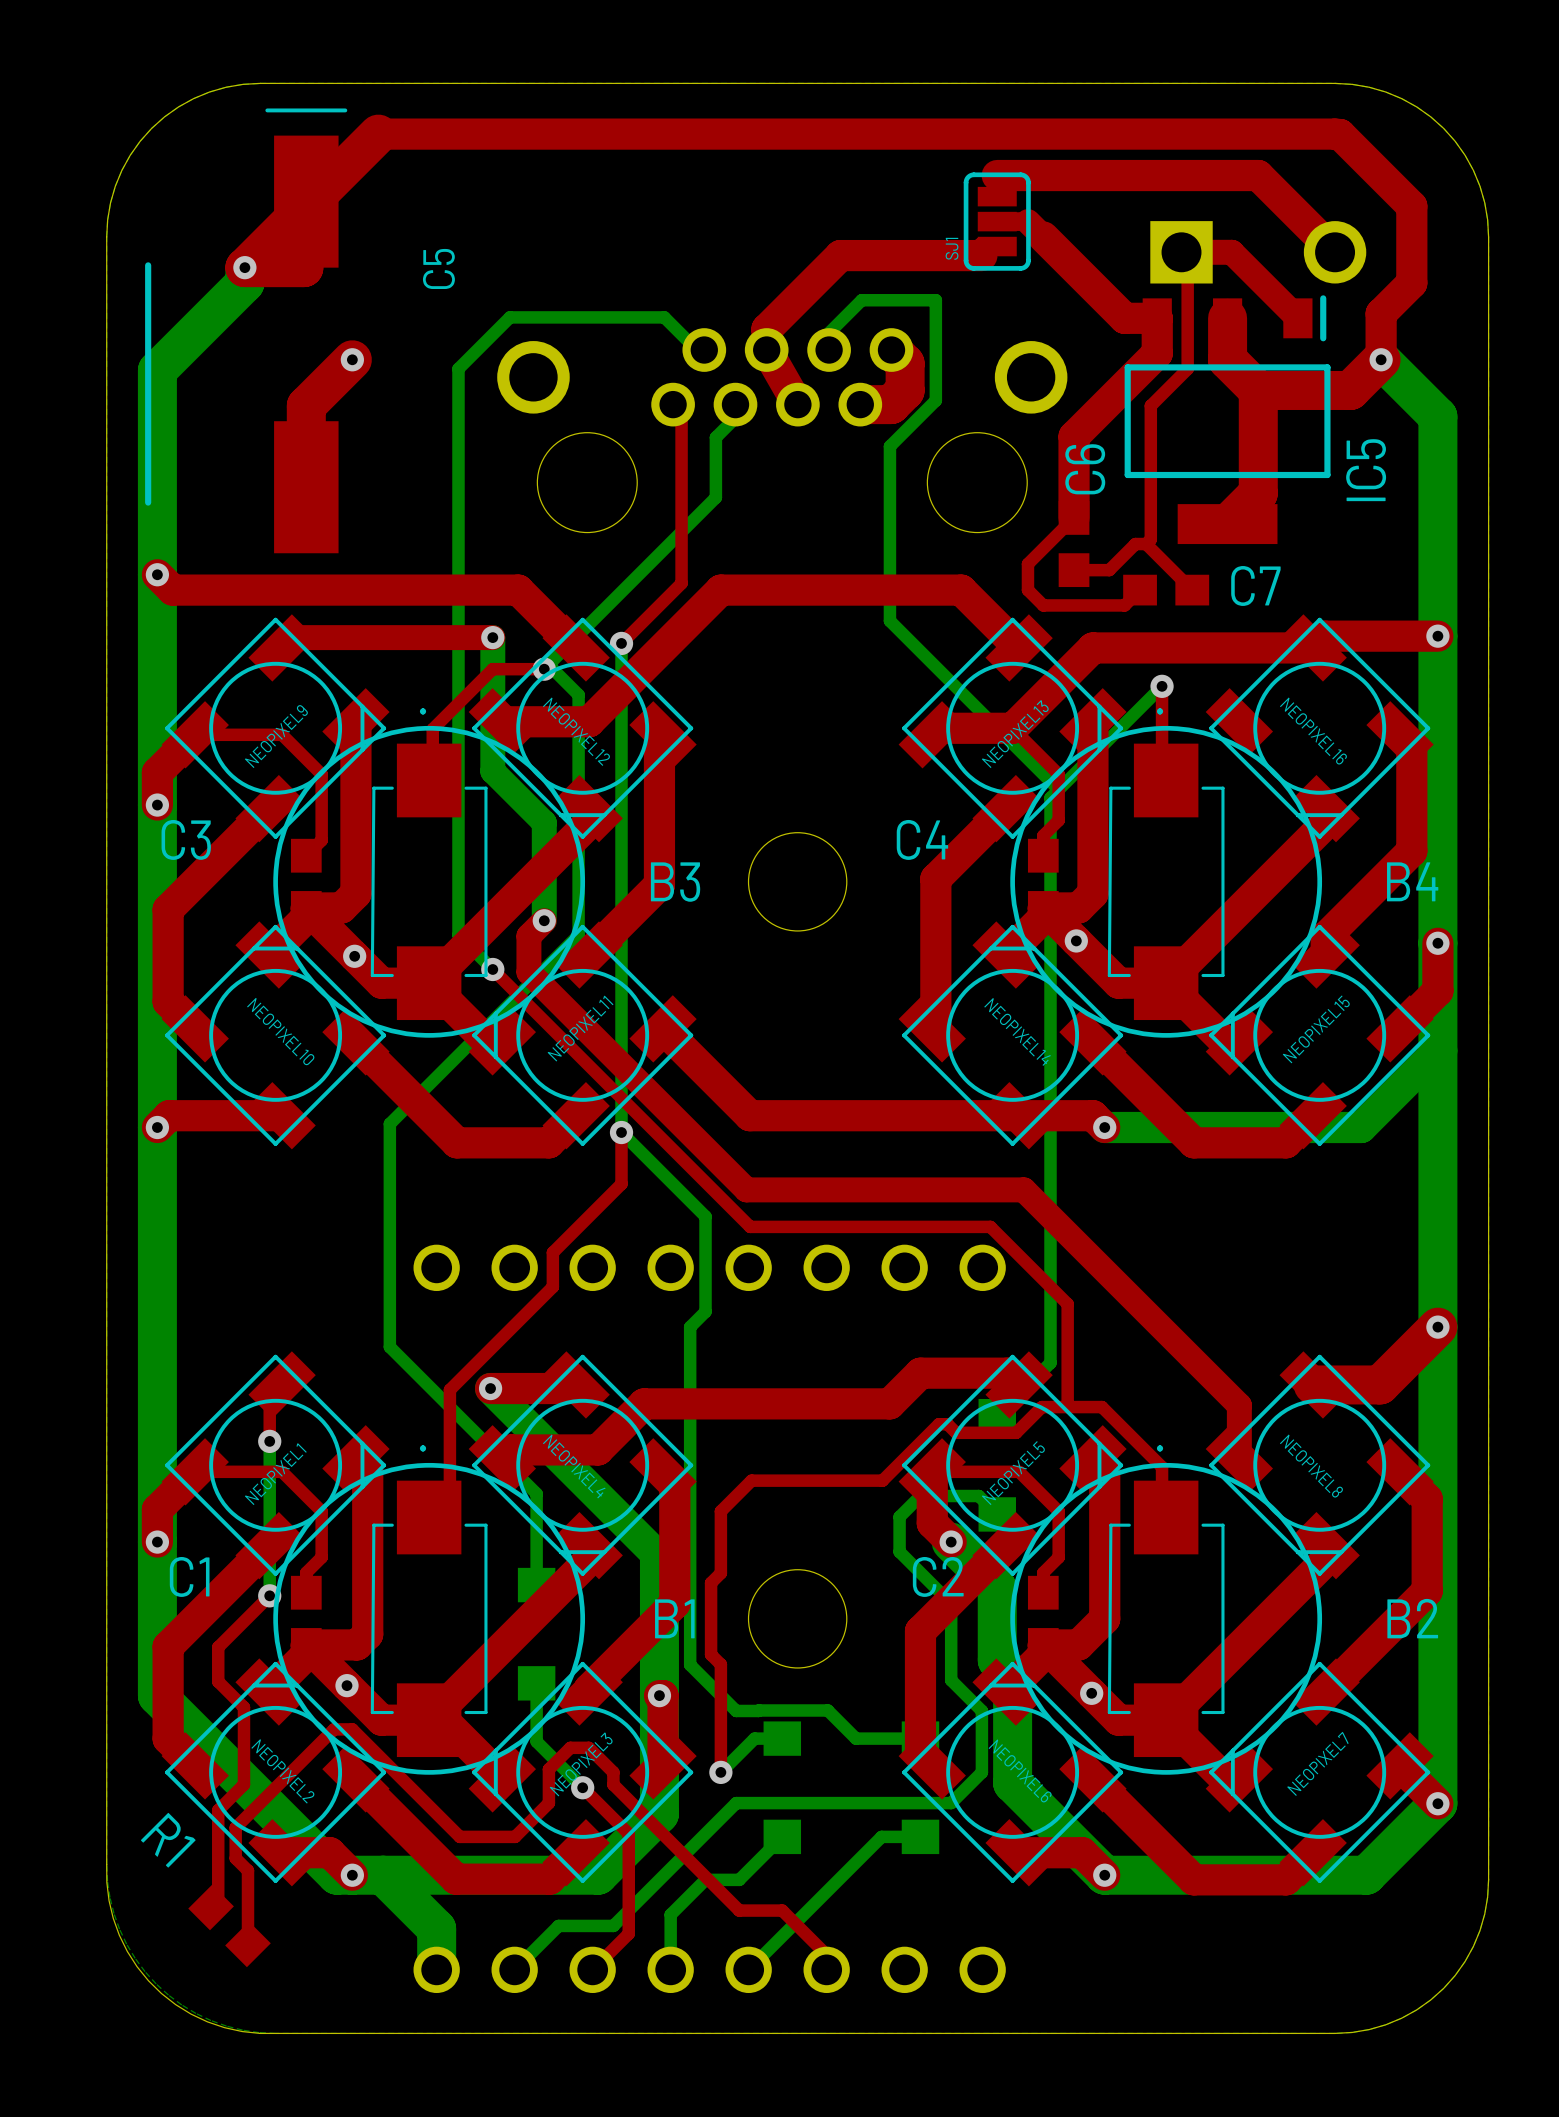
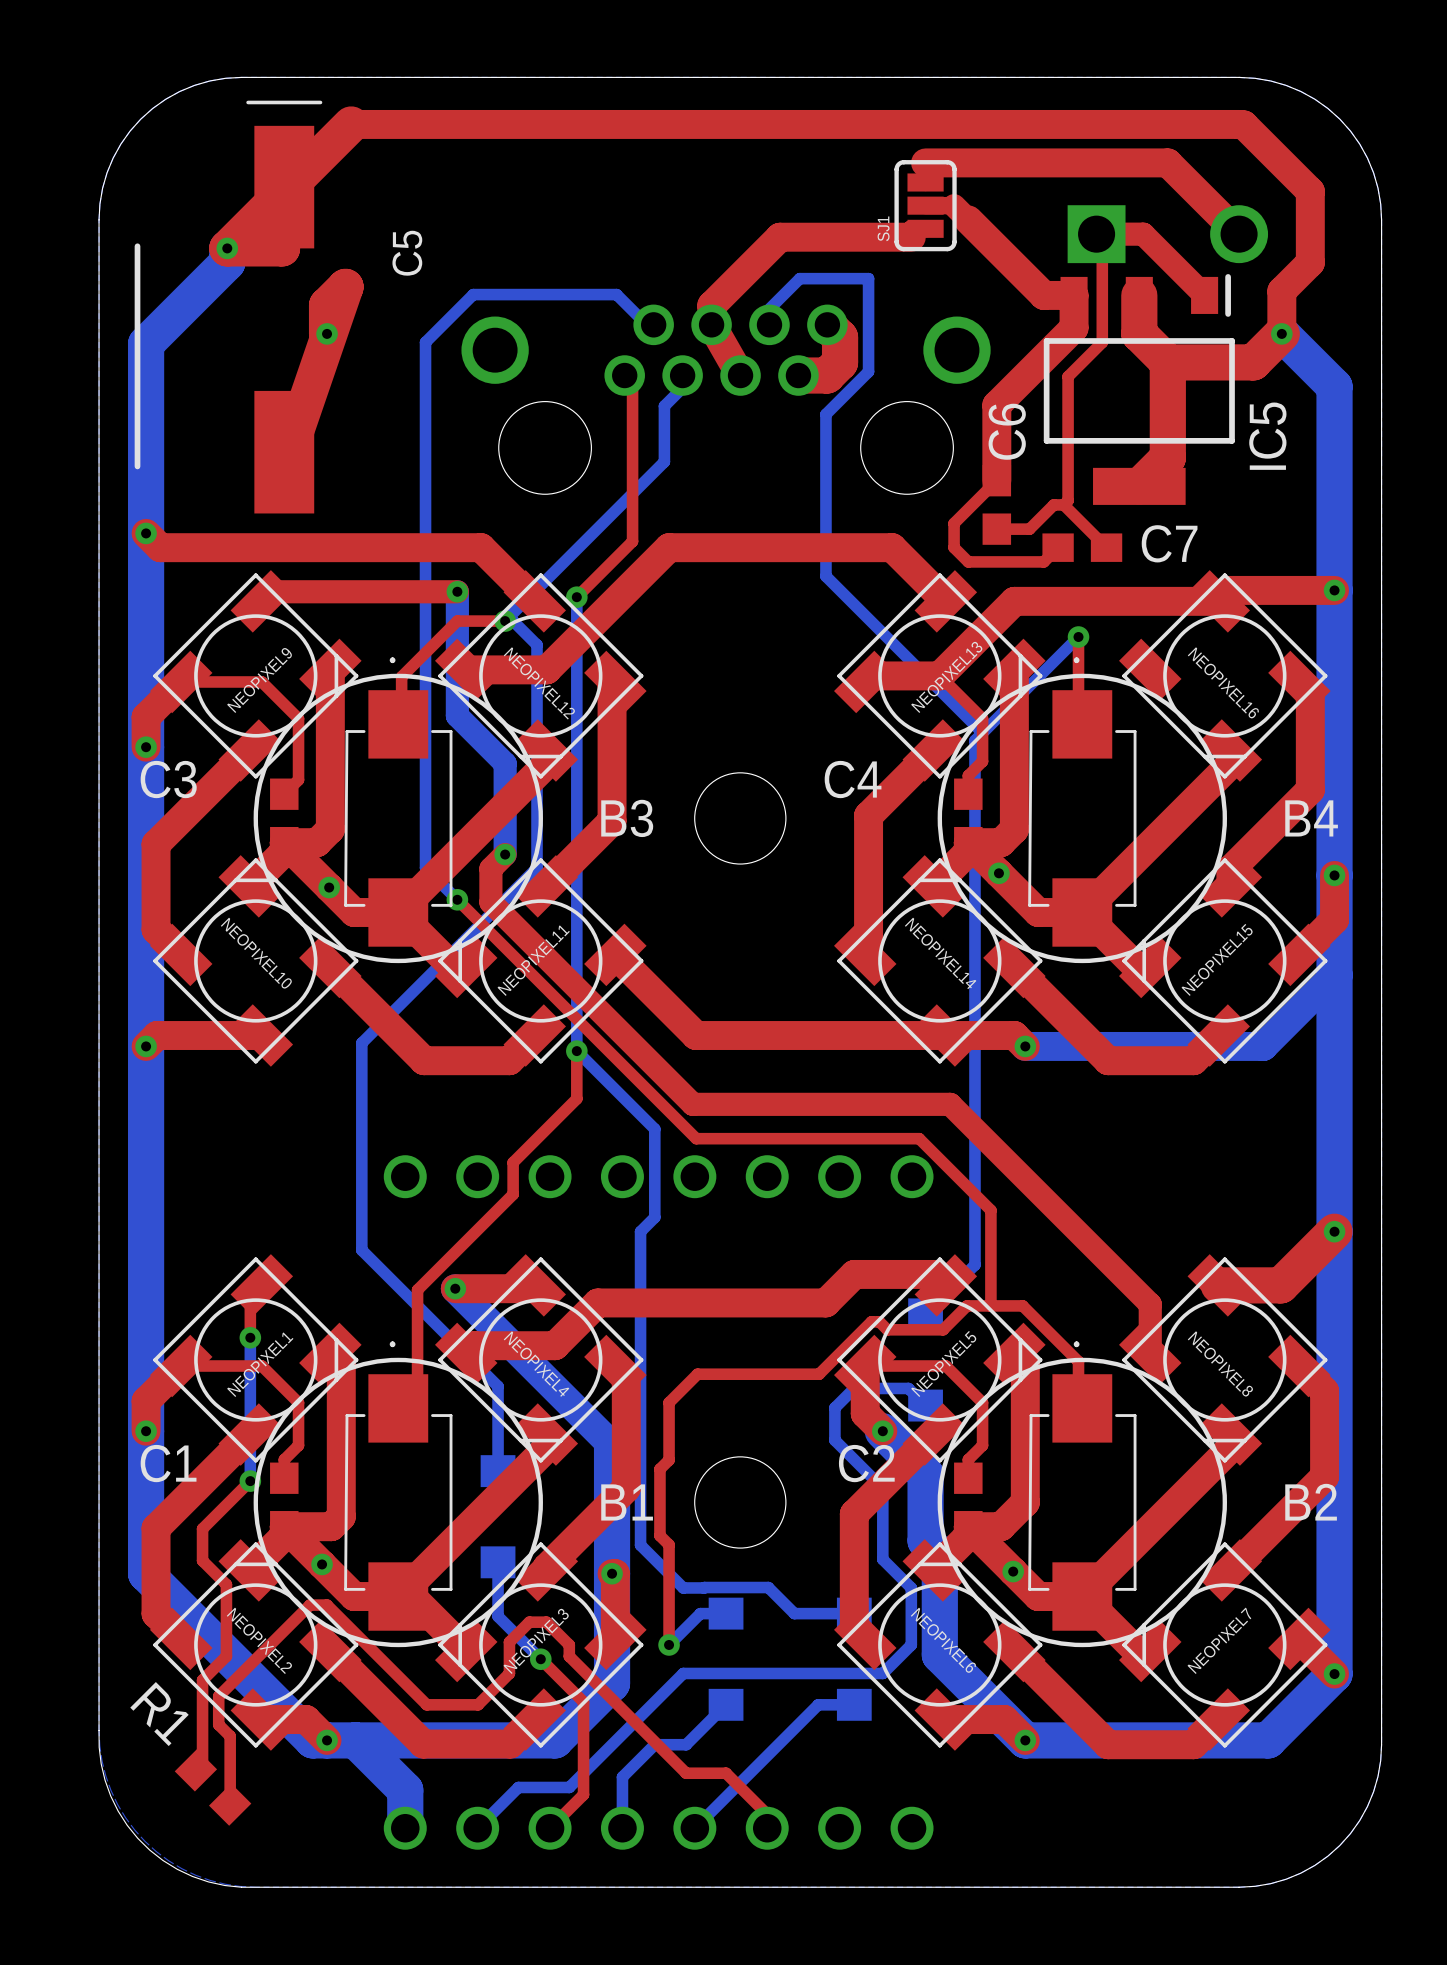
top track: (352, 359) (306, 405) (306, 487) -> (327, 333) (327, 305) (345, 286) (291, 445)

